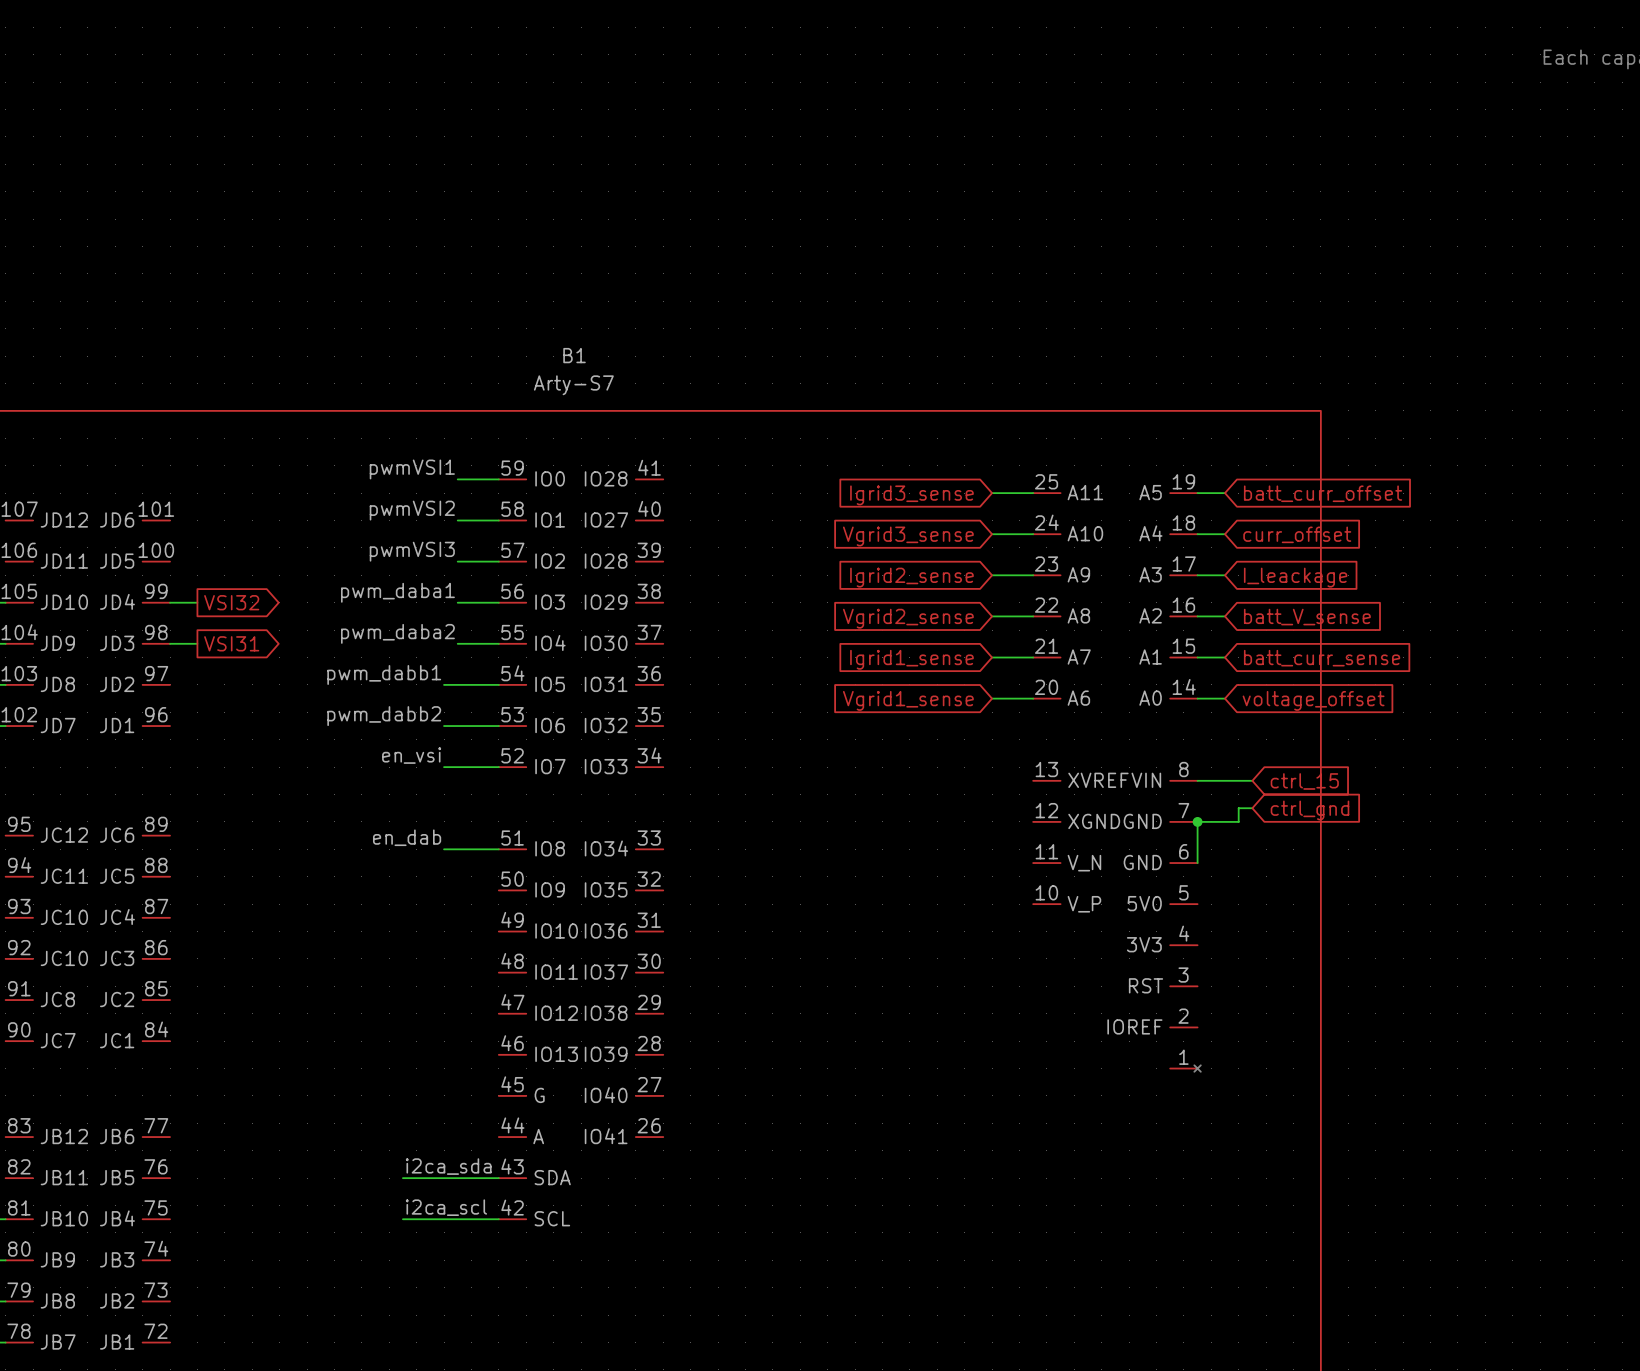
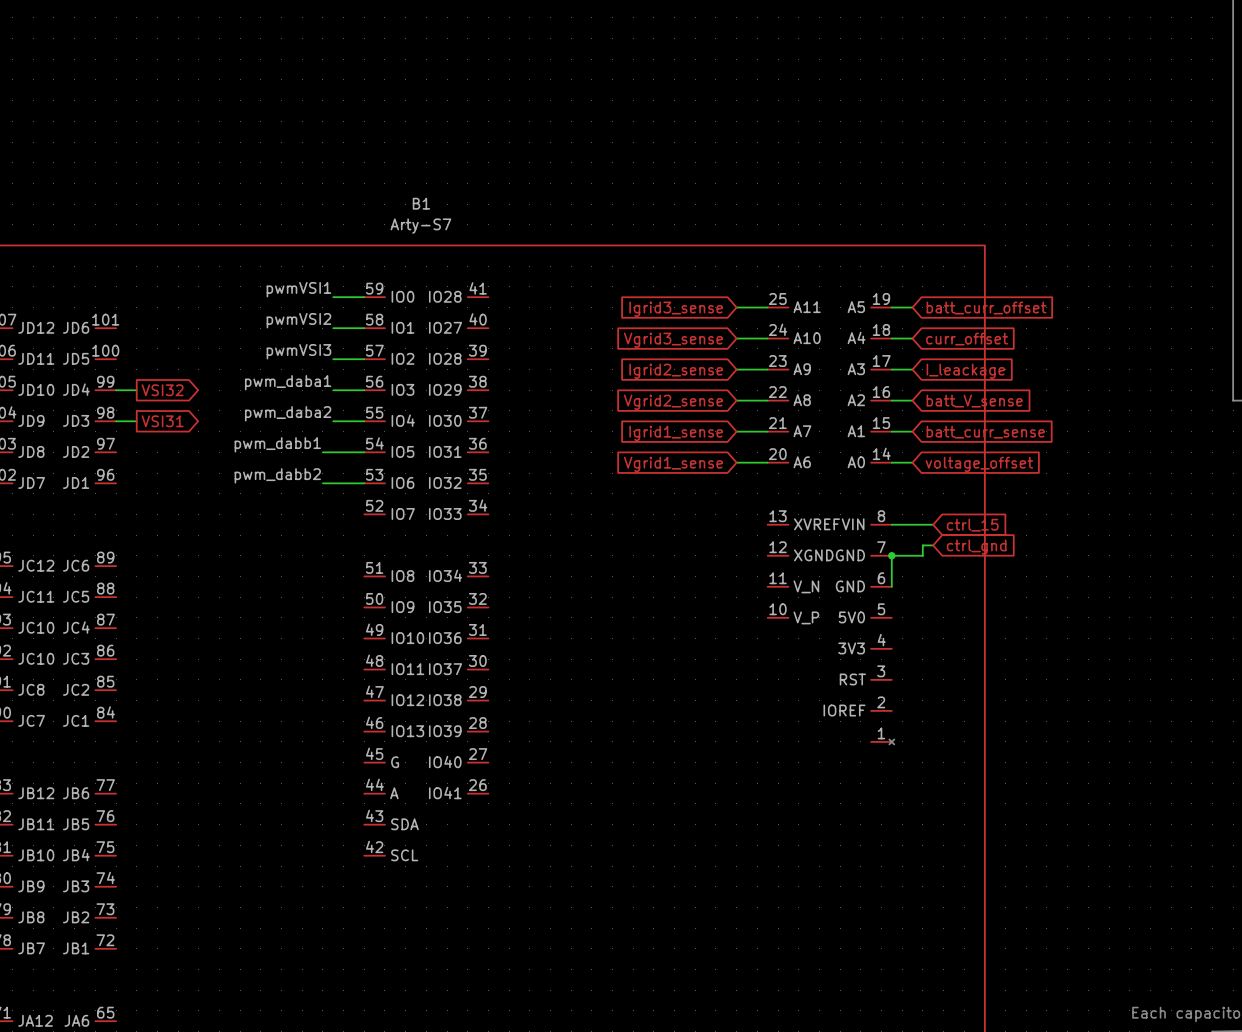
label: en_vsi (411, 755) -> none
wire: (444, 767) (498, 767) -> none
label: en_dab (407, 837) -> none
wire: (444, 849) (498, 849) -> none
label: i2ca_sda (448, 1166) -> none
wire: (402, 1178) (498, 1178) -> none
label: i2ca_scl (446, 1207) -> none
wire: (402, 1219) (498, 1219) -> none

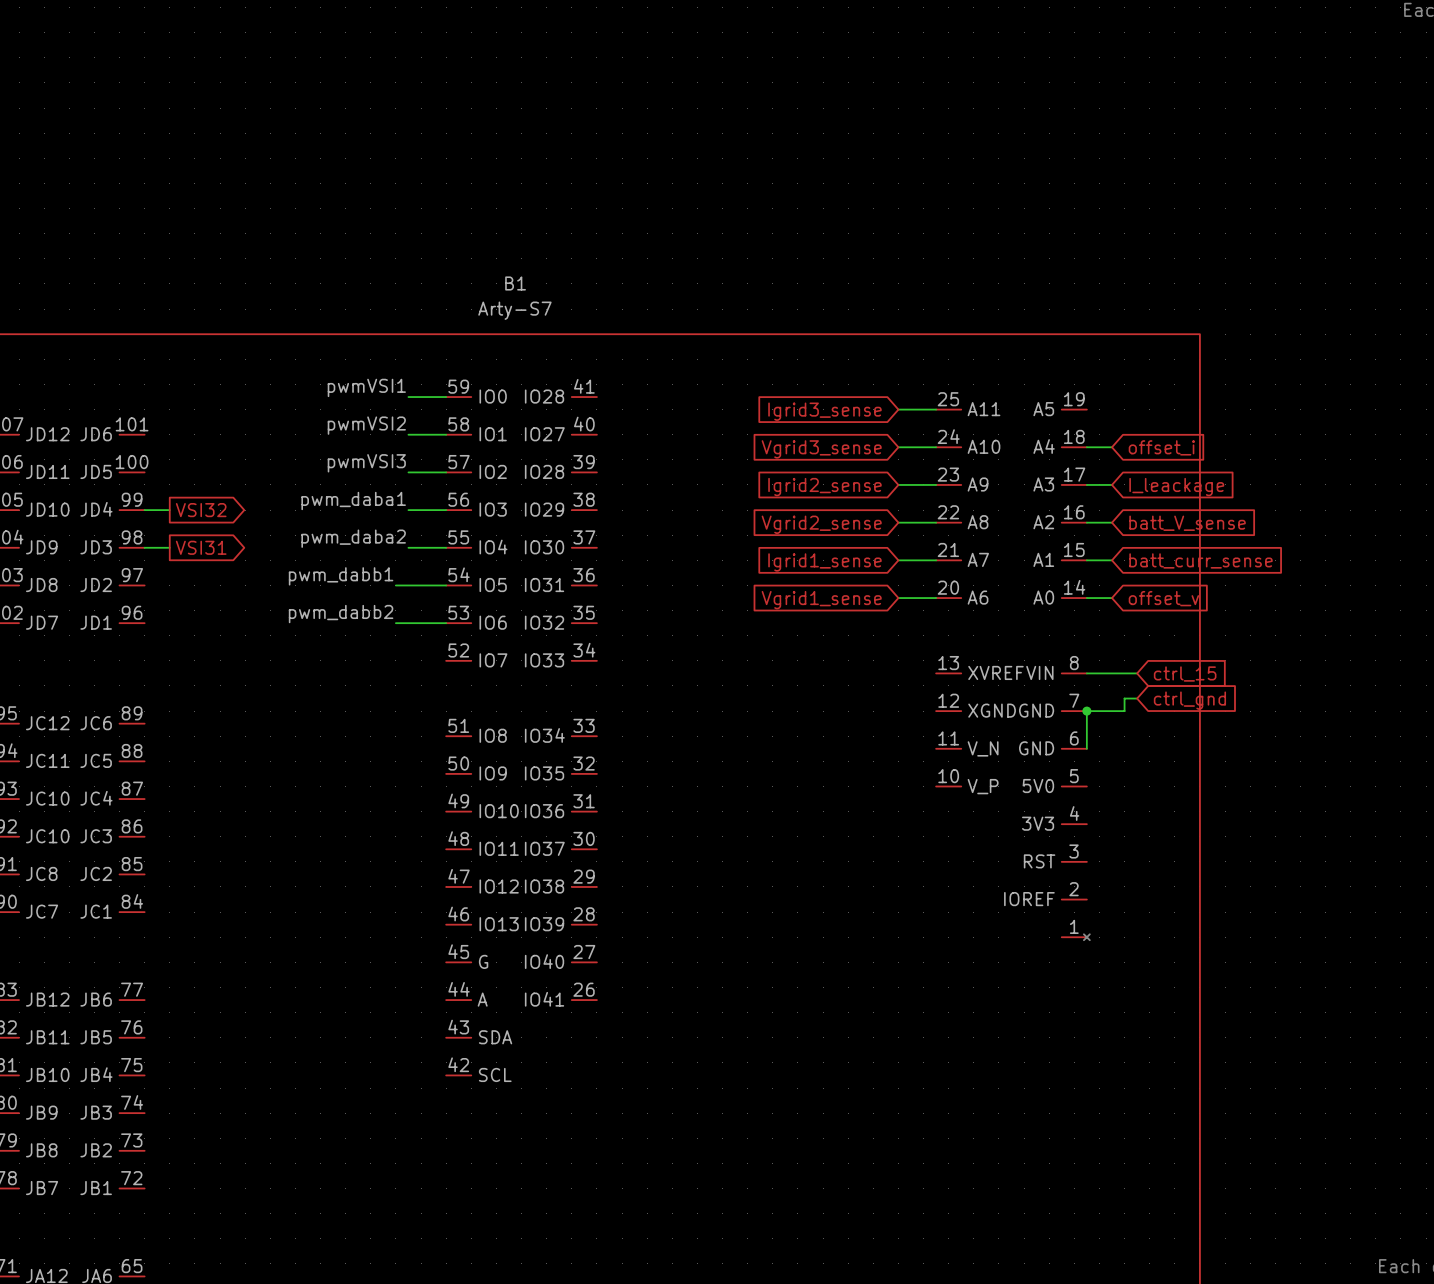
wire: (891, 307) (912, 307) -> none
global label: batt_curr_offset (986, 308) -> none
global label: curr_offset (967, 339) -> offset_i (1161, 447)
global label: voltage_offset (979, 464) -> offset_v (1163, 598)

